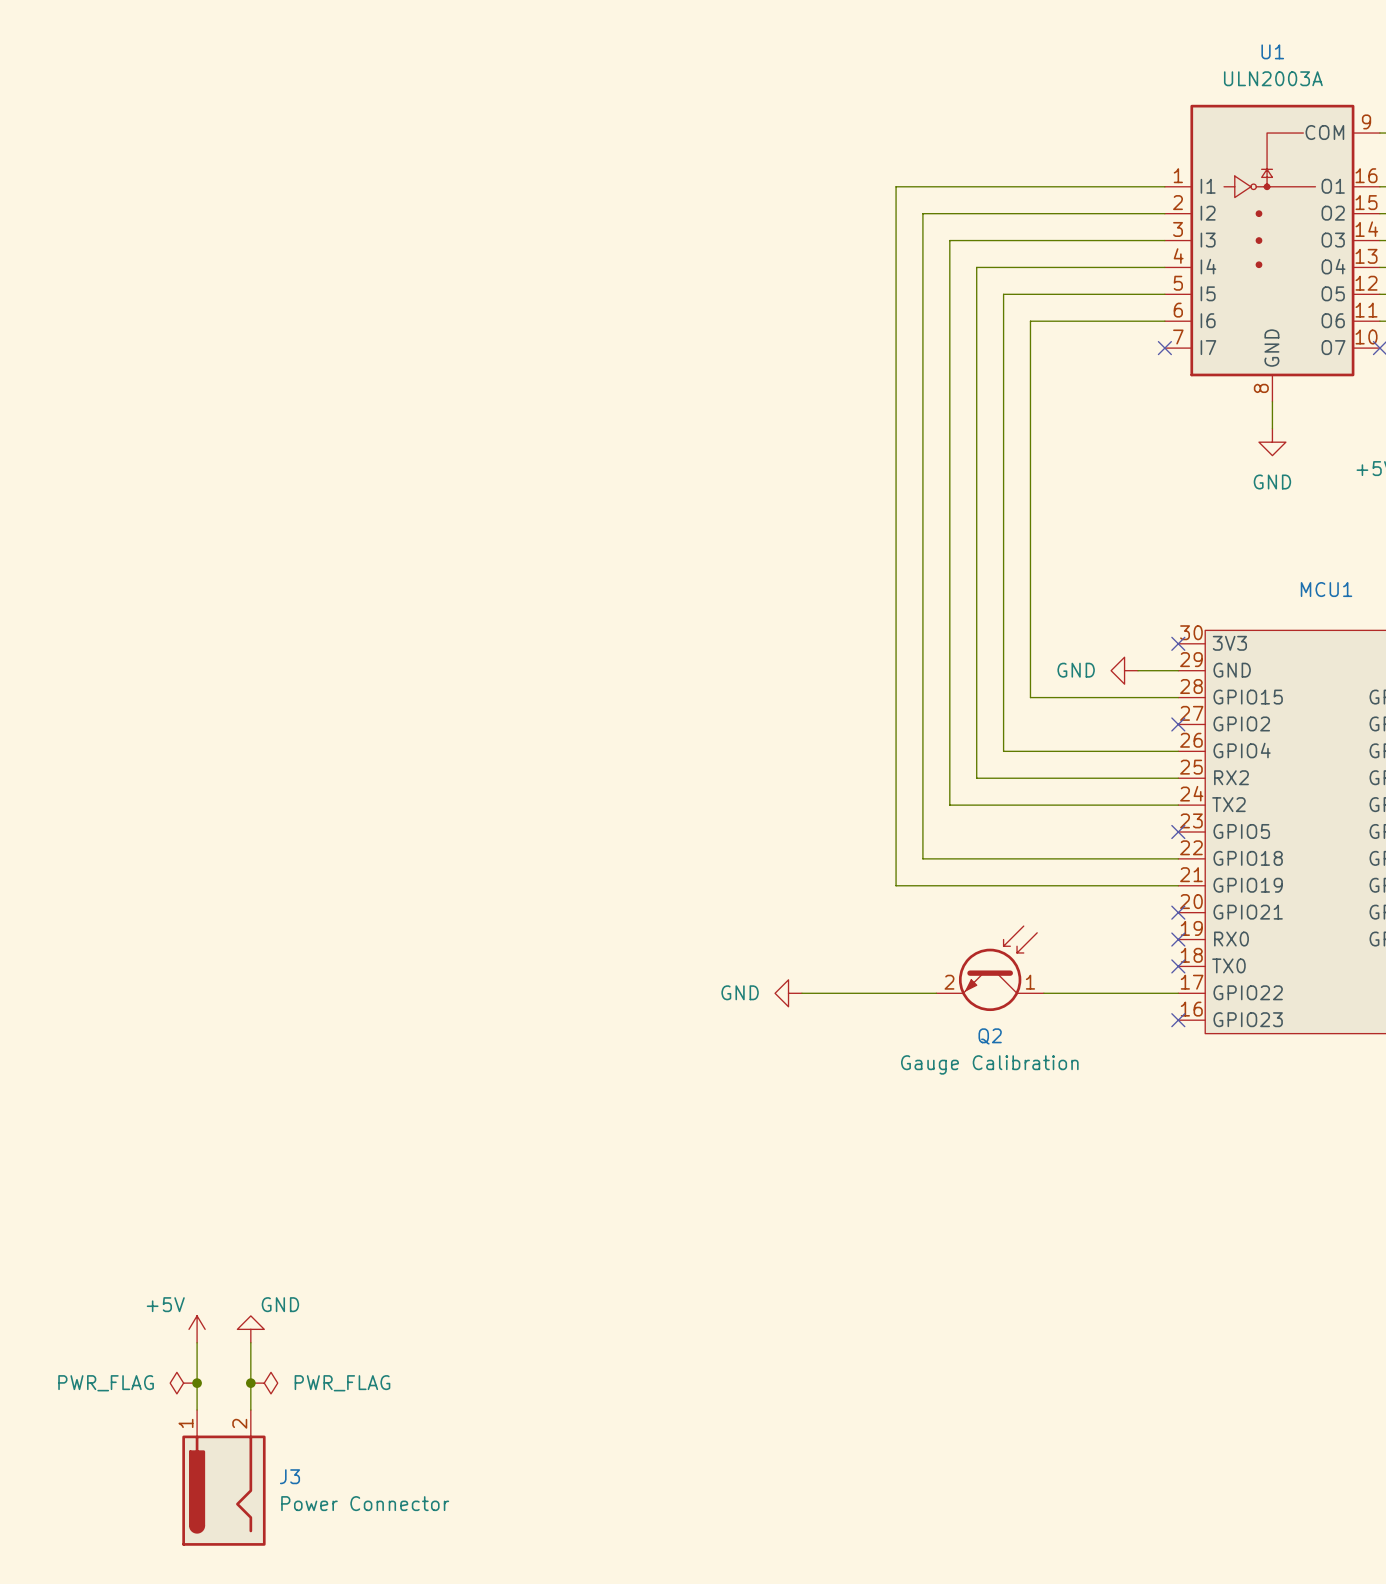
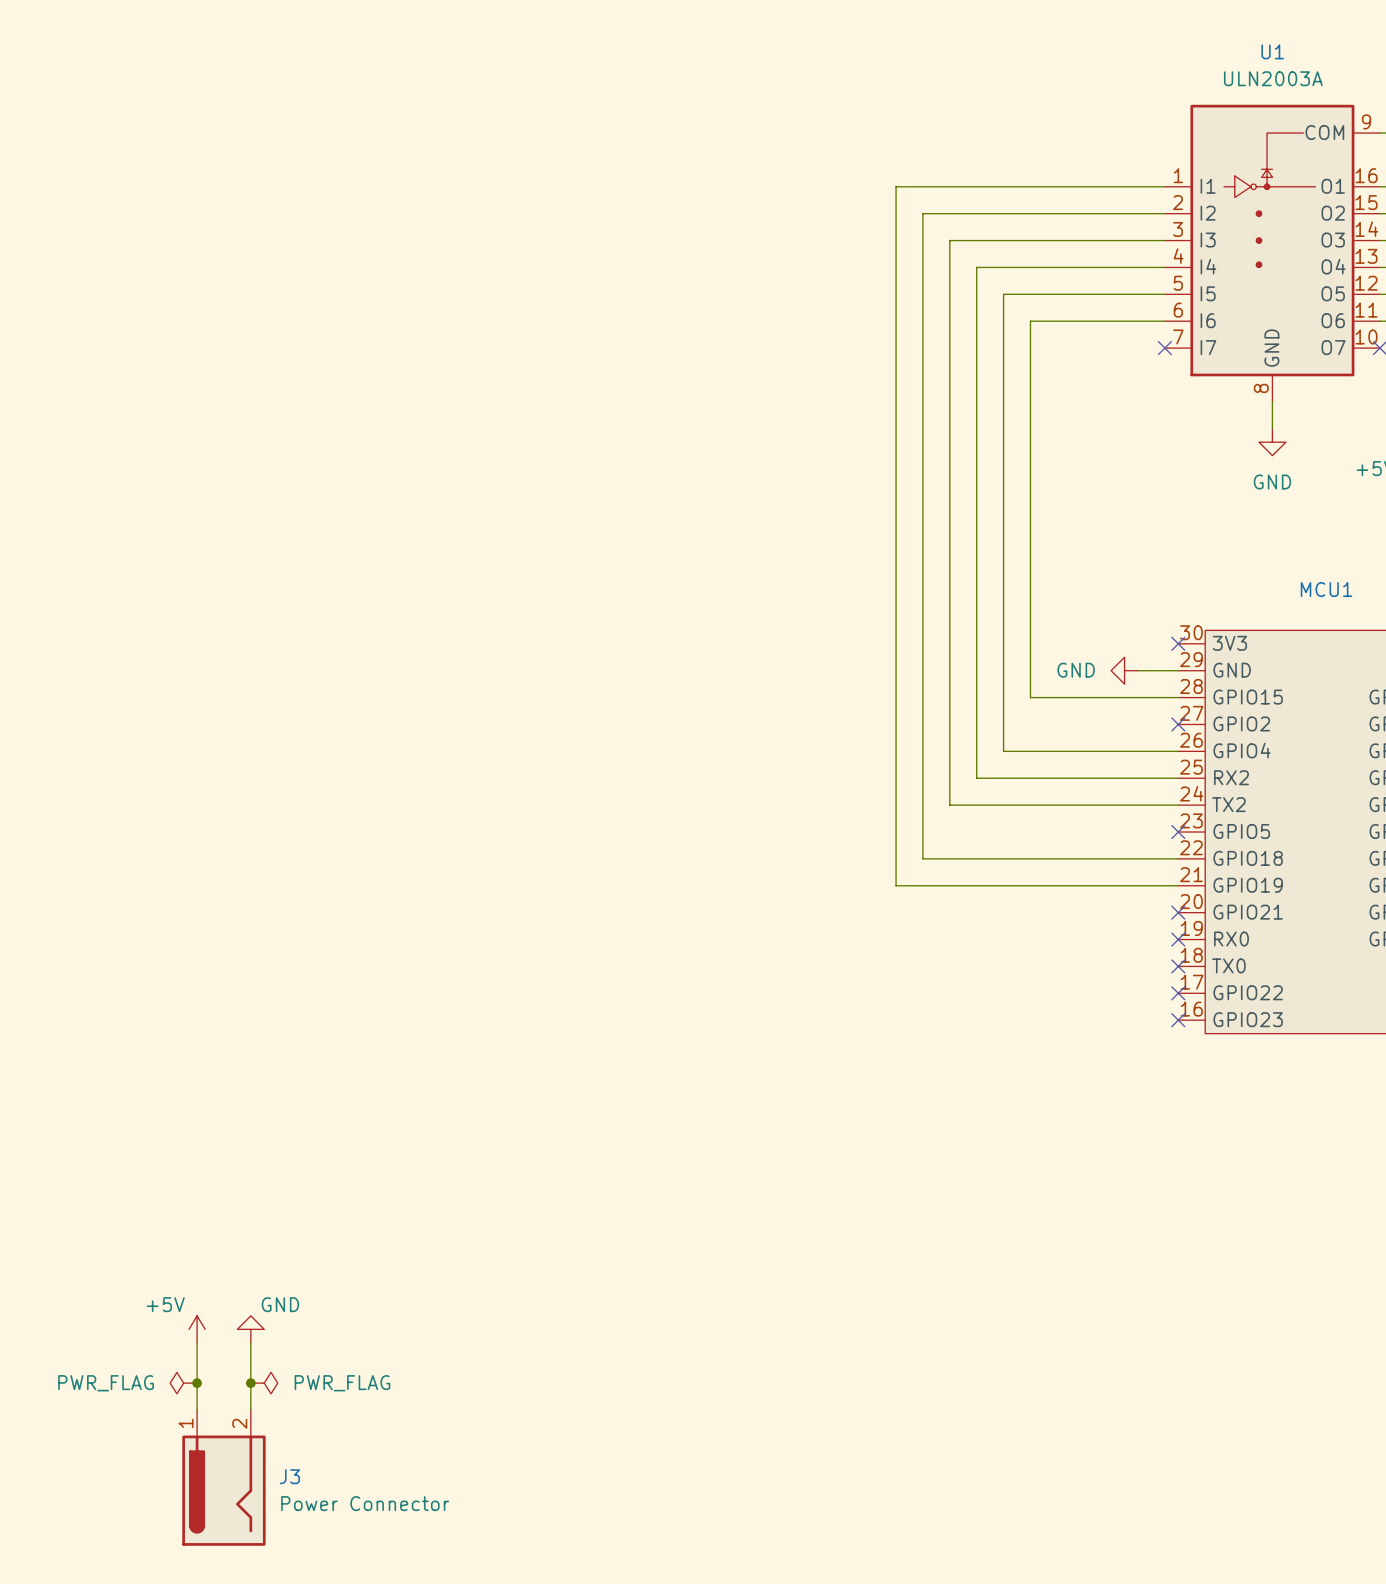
Q2: Gauge Calibration (990, 968) -> none
power symbol: GND (788, 993) -> none
wire: (801, 993) (936, 993) -> none
wire: (1043, 993) (1178, 993) -> none
no-connect mark: none -> (1178, 993)

